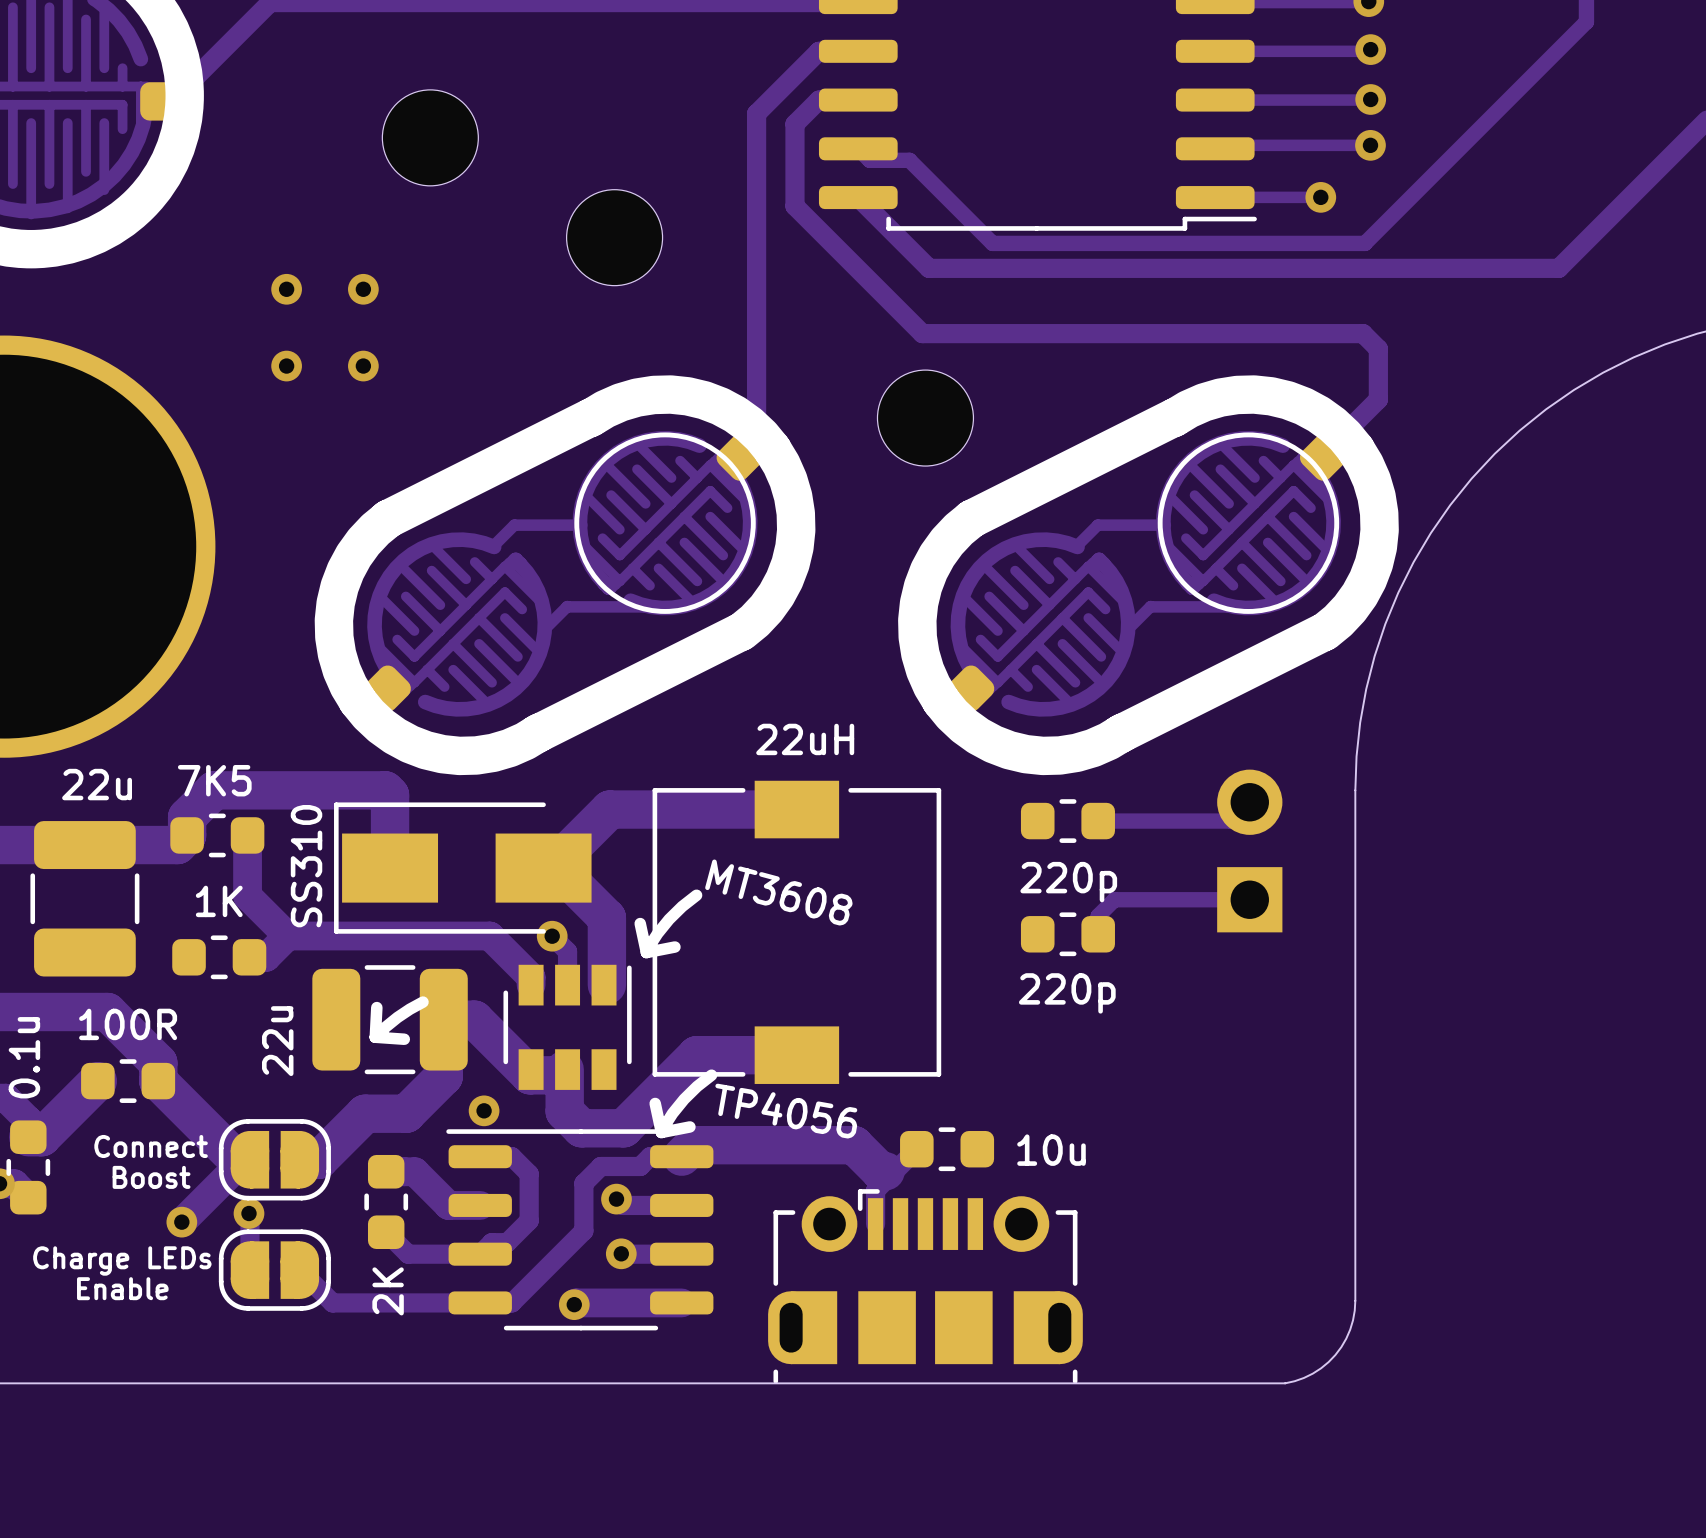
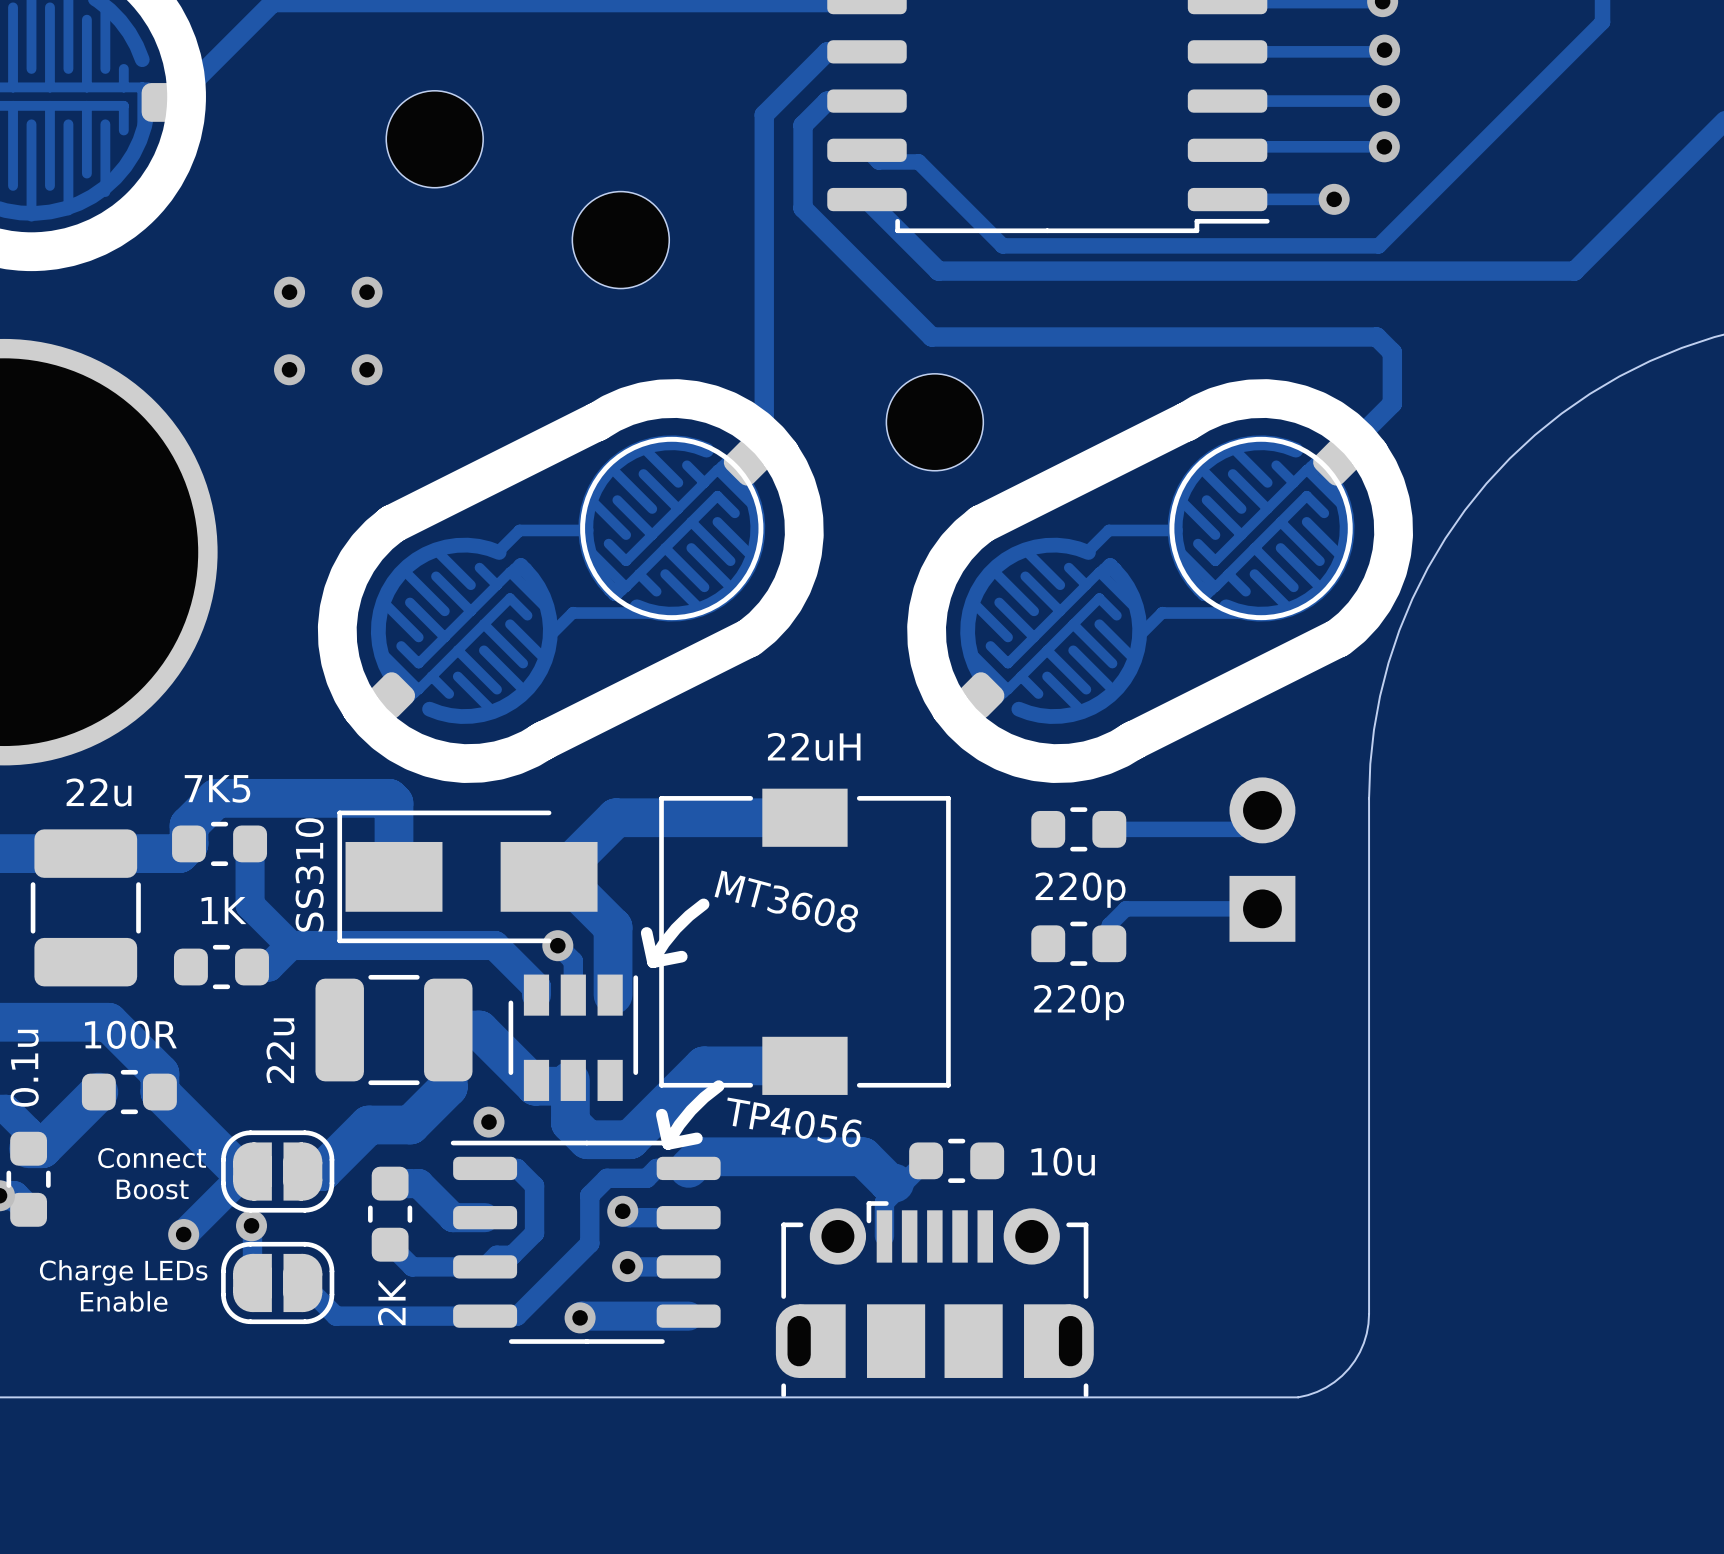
line: (422, 1002) (397, 1017) (375, 1037) -> none
line: (376, 1007) (375, 1037) -> none
line: (375, 1037) (404, 1039) -> none

